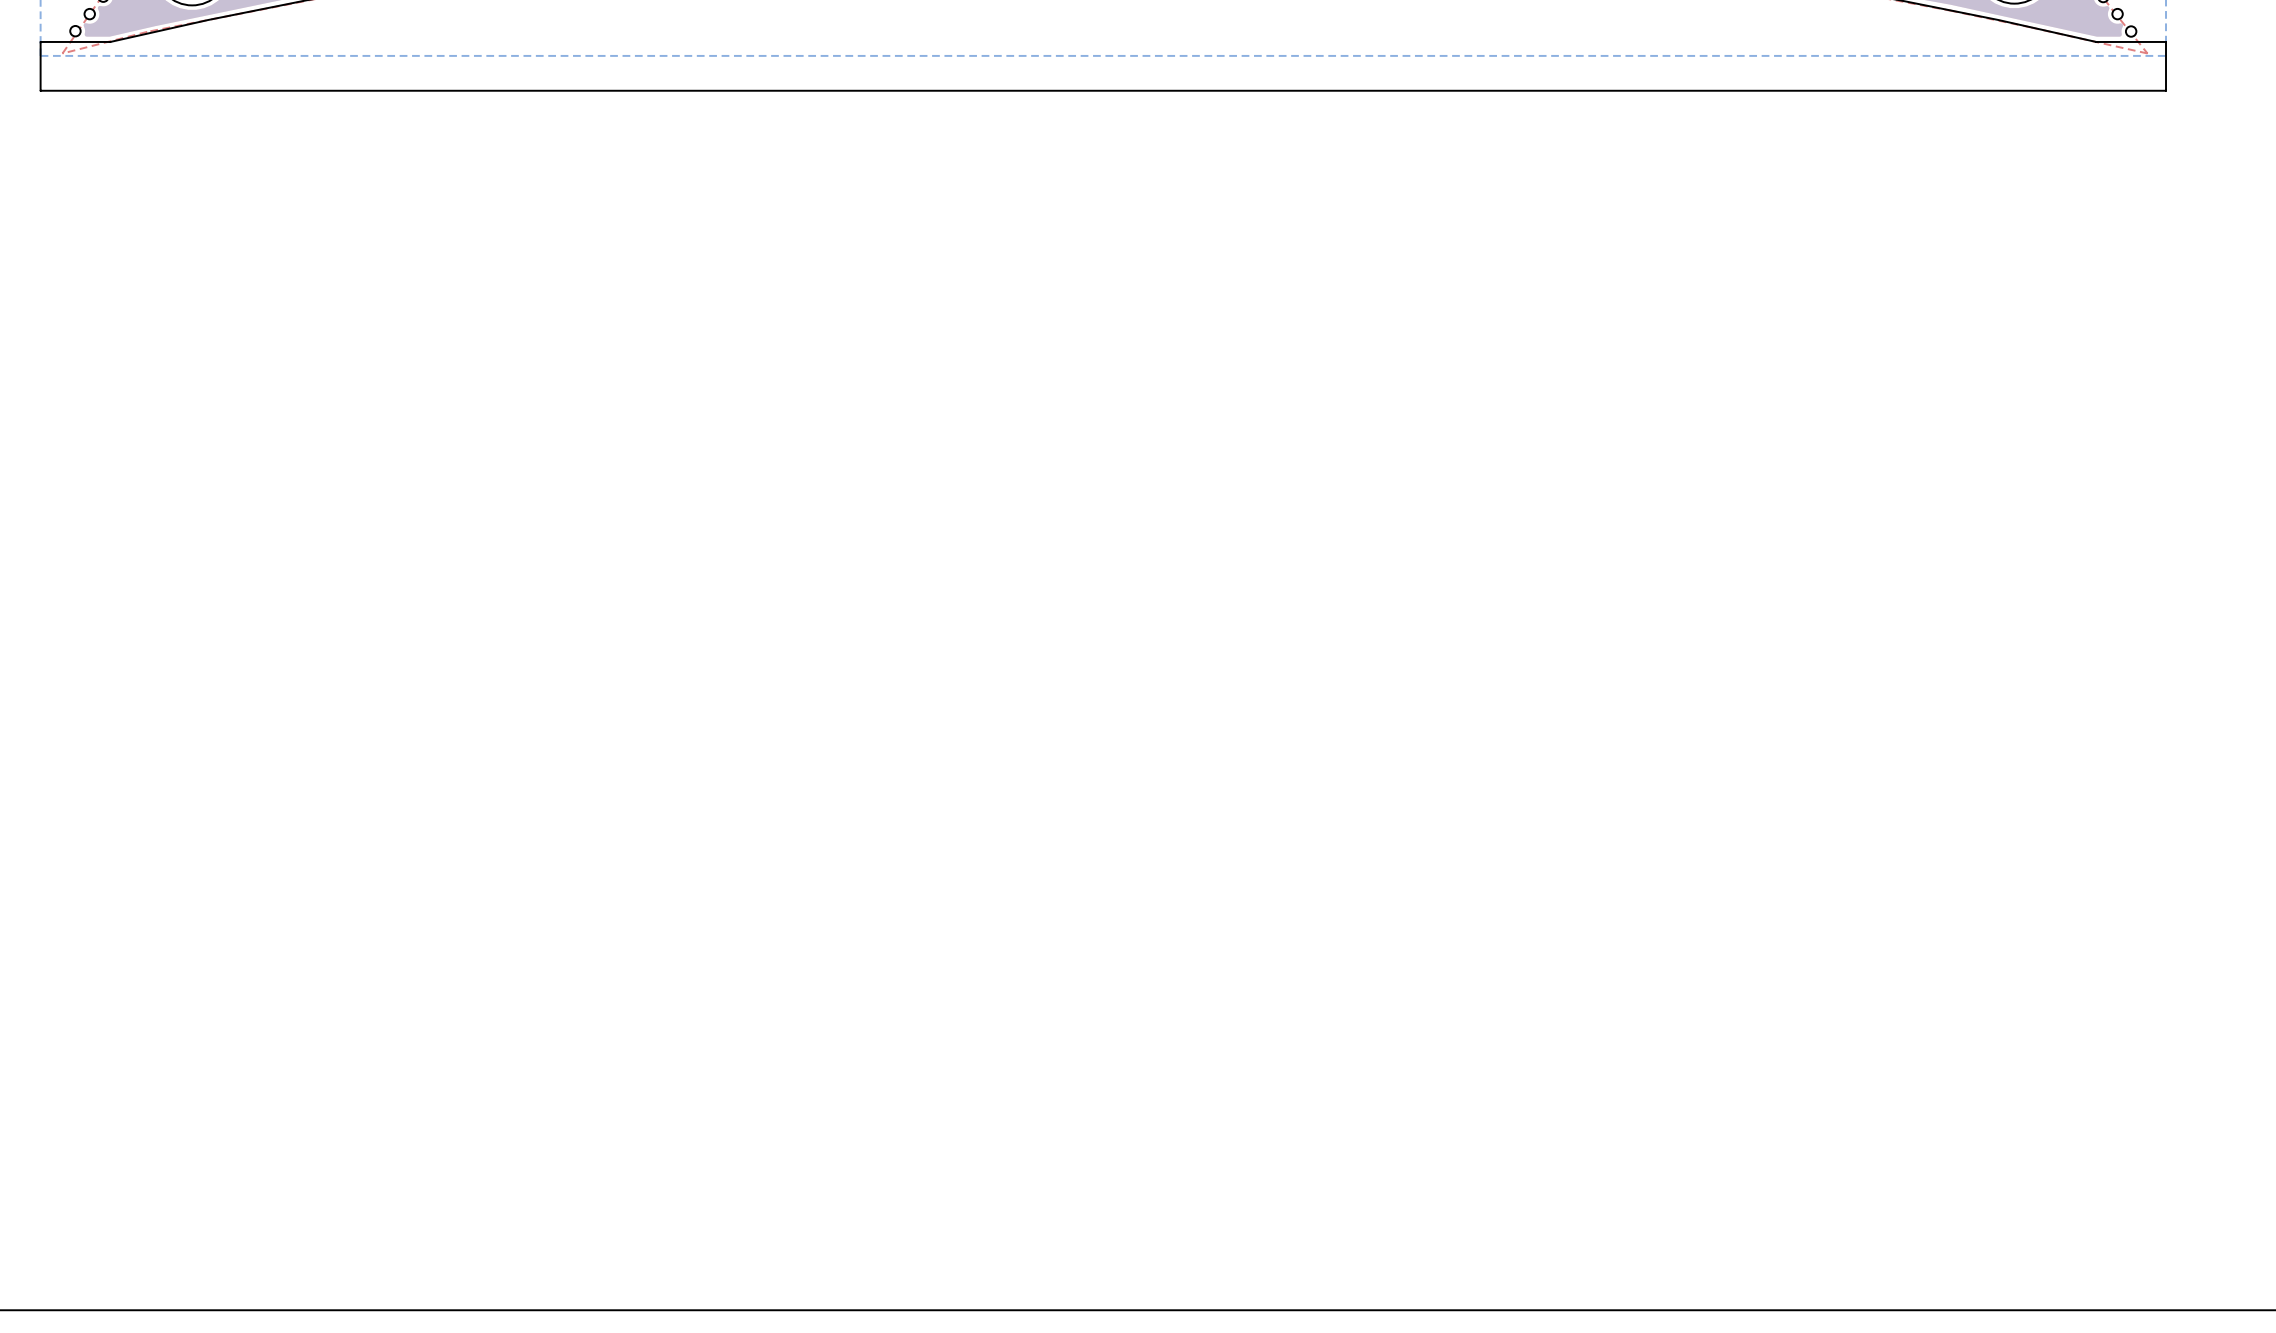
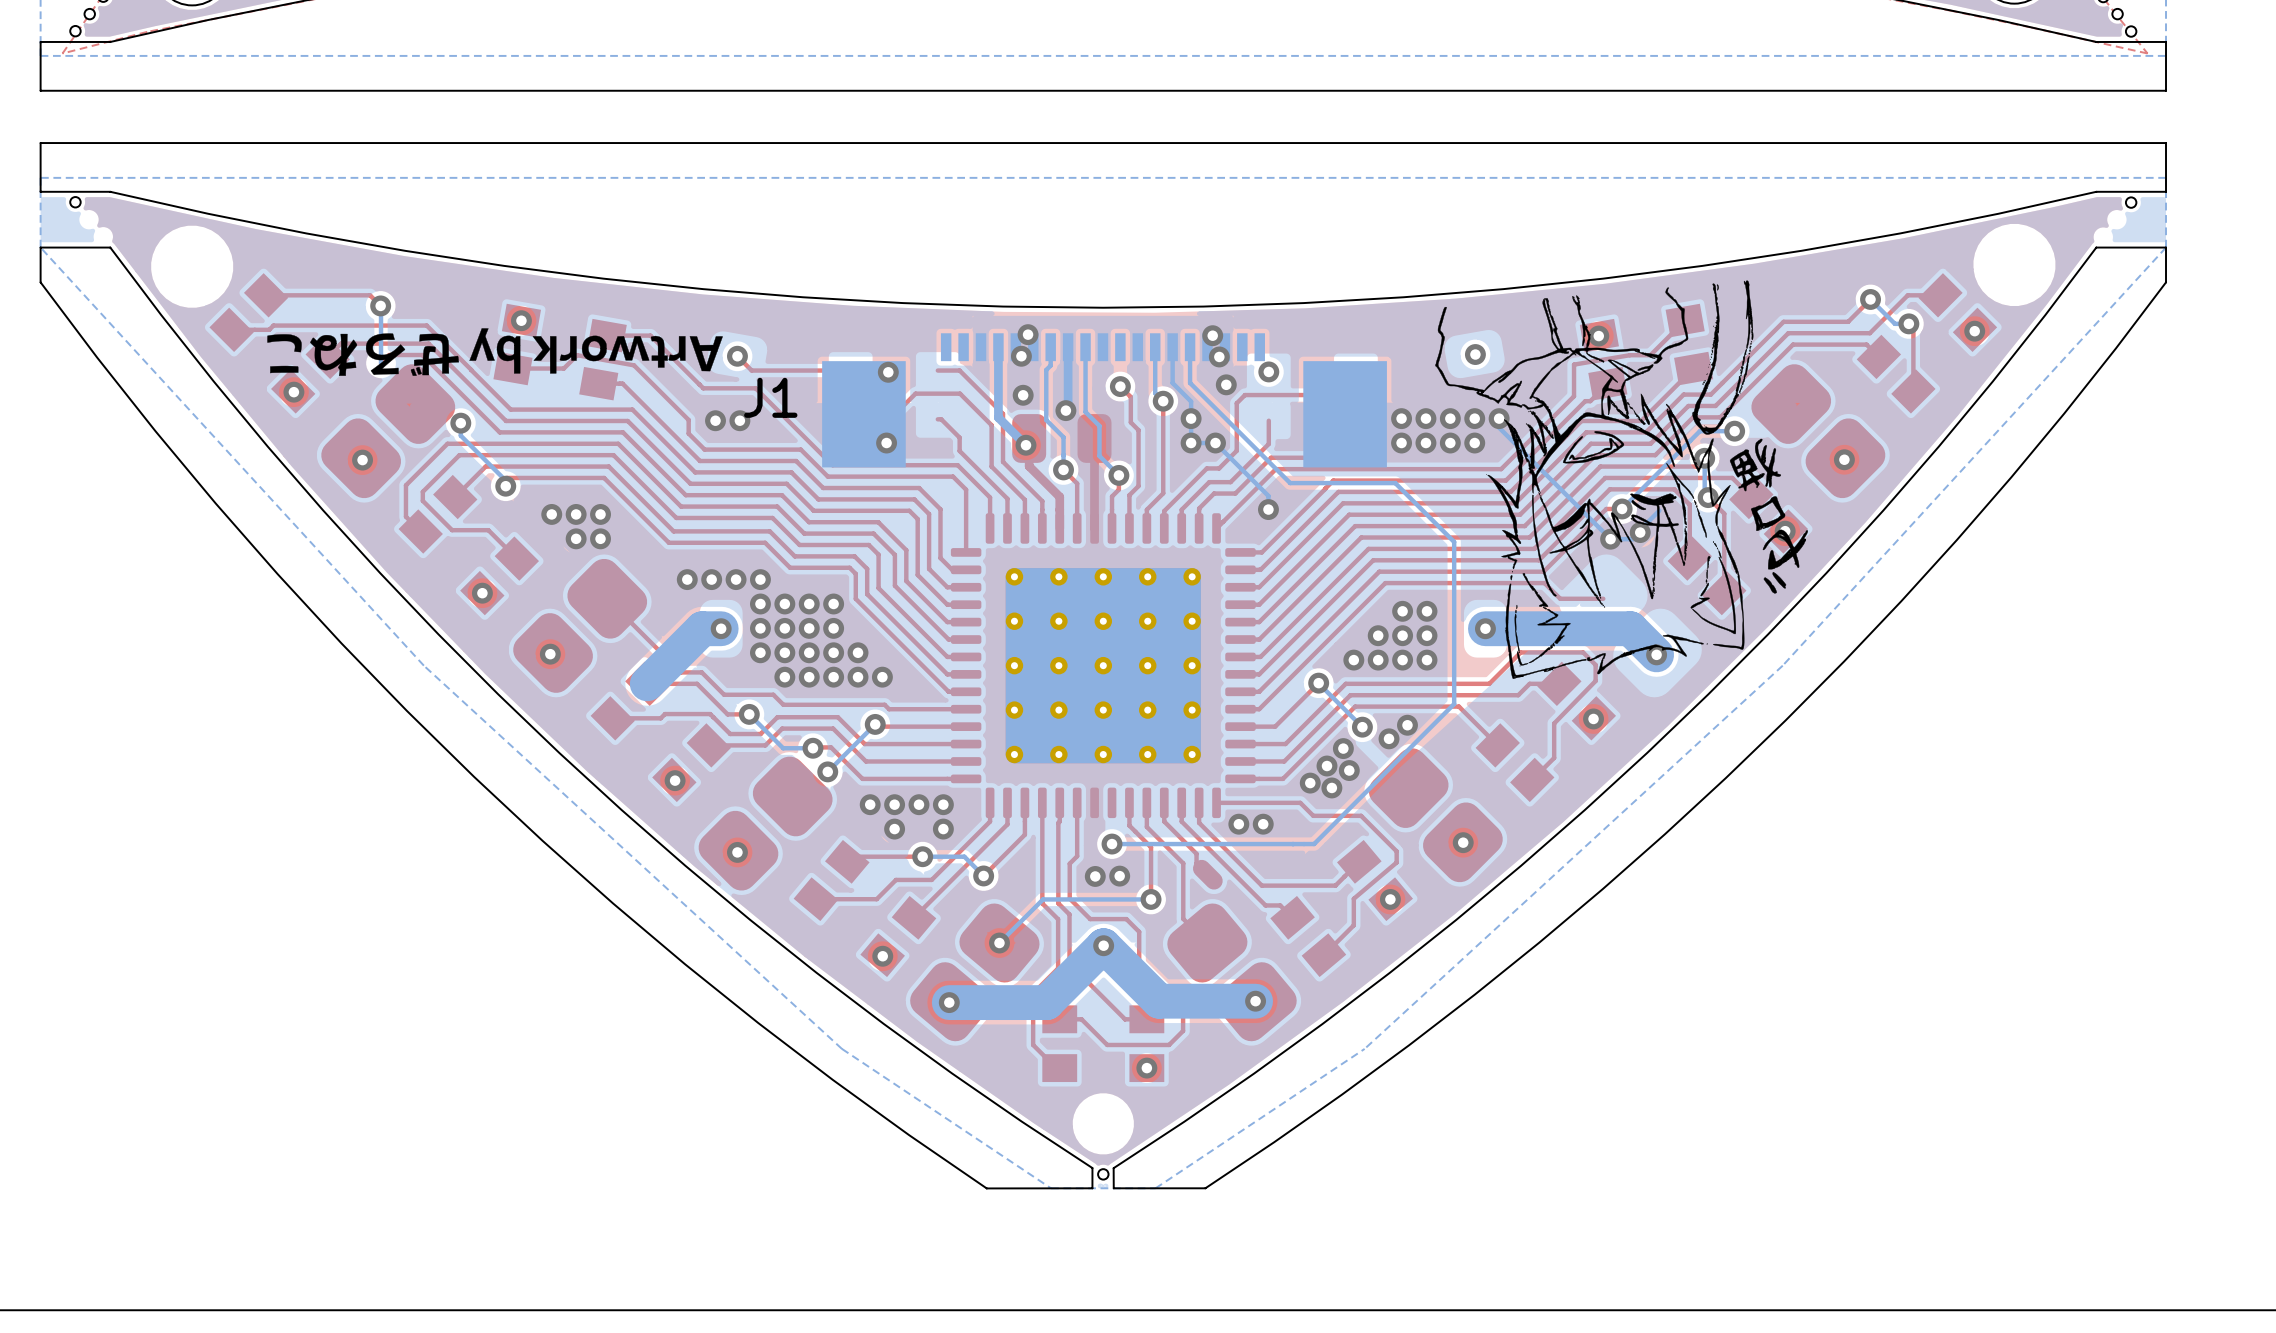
board edge: none -> (2166, 143) (2166, 191) (2096, 191) (1998, 213) (1801, 250) (1603, 278) (1403, 297) (1203, 306) (1103, 307) (902, 303) (703, 289) (603, 278) (404, 250) (208, 213) (110, 191) (40, 191) (40, 143) (2166, 143)
bottom zone outline: none -> (2166, 177) (2166, 247) (1782, 665) (1364, 1048) (1155, 1188) (1051, 1188) (841, 1048) (423, 665) (40, 247) (40, 177) (2166, 177)
part: none -> (75, 202)
part: none -> (2131, 202)
board edge: none -> (110, 247) (40, 247) (40, 282) (155, 431) (277, 574) (341, 643) (474, 776) (542, 841) (684, 964) (833, 1080) (986, 1188) (1092, 1188) (1092, 1168) (952, 1073) (816, 972) (685, 865) (559, 752) (438, 634) (323, 510) (213, 381) (110, 247)
board edge: none -> (2166, 247) (2166, 282) (2064, 413) (2011, 477) (1956, 539) (1844, 661) (1725, 778) (1664, 834) (1602, 889) (1474, 994) (1342, 1094) (1205, 1188) (1113, 1188) (1113, 1168) (1254, 1073) (1389, 972) (1521, 865) (1647, 752) (1768, 634) (1883, 510) (1992, 381) (2096, 247) (2166, 247)
drawing: none -> [1435, 280, 1808, 679]
top track: none -> (266, 295) (370, 295) (380, 305)
top track: none -> (1940, 295) (1907, 295) (1869, 333) (1788, 333) (1715, 405) (1688, 405) (1650, 443) (1591, 443) (1520, 514) (1349, 514) (1259, 604) (1240, 604)
top track: none -> (1870, 299) (1848, 321) (1783, 321) (1710, 394) (1683, 394) (1645, 432) (1586, 432) (1515, 503) (1343, 503) (1259, 587) (1240, 587)
bottom track: none -> (1870, 299) (1894, 323) (1908, 323)
via: none -> (1870, 299)
via: none -> (380, 305)
bottom track: none -> (381, 306) (381, 363)
via: none -> (521, 320)
top track: none -> (1685, 320) (1650, 355) (1629, 355) (1574, 364) (1574, 396) (1501, 469) (1275, 469) (1216, 528)
top track: none -> (1908, 323) (1913, 328) (1913, 391)
via: none -> (1908, 323)
drawing: none -> [267, 328, 723, 376]
top track: none -> (231, 329) (269, 329) (273, 325) (426, 325) (510, 409) (632, 409) (695, 472) (791, 472) (818, 499) (914, 499) (929, 514) (929, 568) (947, 587) (966, 587)
via: none -> (1974, 331)
via: none -> (1028, 334)
top track: none -> (607, 335) (650, 335) (703, 388) (755, 388) (832, 465) (957, 465) (990, 497) (990, 528)
via: none -> (1212, 335)
via: none -> (1598, 336)
part: none -> (279, 343)
part: none -> (1926, 343)
bottom track: none -> (998, 347) (998, 417) (1025, 445)
bottom track: none -> (1050, 347) (1050, 365) (1046, 369) (1046, 420) (1063, 437) (1063, 469)
bottom track: none -> (1068, 347) (1068, 408) (1065, 410)
bottom track: none -> (1085, 347) (1085, 412) (1099, 425) (1099, 456) (1118, 475)
bottom track: none -> (1155, 347) (1155, 393) (1163, 401)
bottom track: none -> (1172, 347) (1172, 383) (1191, 401) (1191, 443) (1215, 443) (1268, 495) (1268, 509)
bottom track: none -> (1190, 347) (1190, 382) (1290, 483) (1395, 483) (1454, 541) (1454, 703) (1314, 844) (1112, 844)
part: none -> (560, 352)
part: none -> (1646, 352)
via: none -> (1475, 354)
top track: none -> (327, 356) (341, 343) (428, 343) (506, 420) (627, 420) (690, 483) (786, 483) (813, 510) (909, 510) (917, 519) (917, 575) (947, 604) (966, 604)
top track: none -> (737, 356) (751, 370) (850, 370)
via: none -> (737, 356)
via: none -> (1021, 356)
via: none -> (1219, 356)
top track: none -> (1878, 356) (1866, 344) (1793, 344) (1720, 417) (1693, 417) (1655, 455) (1595, 455) (1524, 526) (1355, 526) (1259, 622) (1240, 622)
top track: none -> (381, 363) (389, 355) (422, 355) (499, 432) (623, 432) (685, 495) (782, 495) (809, 522) (878, 522) (906, 550) (906, 581) (947, 622) (966, 622)
top track: none -> (512, 368) (563, 368) (577, 355) (633, 365) (688, 420) (688, 433) (704, 449) (800, 449) (827, 476) (953, 476) (966, 489) (966, 552)
top track: none -> (1693, 368) (1641, 420) (1581, 420) (1510, 491) (1338, 491) (1260, 569) (1240, 569)
top track: none -> (937, 370) (959, 370) (1003, 413) (1003, 461) (1042, 501) (1042, 528)
via: none -> (1268, 371)
top track: none -> (1355, 371) (1334, 371) (1310, 395) (1244, 395) (1236, 403) (1236, 450) (1219, 468) (1206, 468) (1164, 511) (1164, 528)
via: none -> (888, 372)
top track: none -> (598, 383) (622, 383) (699, 461) (796, 461) (823, 488) (919, 488) (940, 509) (940, 558) (952, 569) (966, 569)
top track: none -> (1607, 383) (1590, 401) (1585, 401) (1505, 480) (1333, 480) (1261, 552) (1240, 552)
via: none -> (1226, 384)
top track: none -> (1120, 386) (1130, 397) (1130, 422) (1138, 430) (1138, 486) (1129, 495) (1129, 528)
via: none -> (1120, 386)
via: none -> (293, 392)
via: none -> (1023, 395)
J1: none -> (1104, 400)
top track: none -> (1163, 401) (1163, 493) (1146, 509) (1146, 528)
via: none -> (1163, 401)
via: none -> (1065, 410)
via: none -> (1191, 418)
via: none -> (1401, 418)
via: none -> (1425, 418)
via: none -> (1450, 418)
via: none -> (1474, 418)
bottom track: none -> (1499, 418) (1499, 427) (1610, 539) (1633, 539) (1659, 510)
via: none -> (1499, 418)
top track: none -> (850, 419) (889, 419) (915, 393) (960, 393) (991, 425) (991, 466) (1024, 499) (1024, 528)
top track: none -> (937, 419) (941, 419) (959, 437) (959, 451) (1007, 498) (1007, 528)
via: none -> (715, 420)
via: none -> (739, 420)
top track: none -> (1268, 420) (1268, 443) (1230, 482) (1209, 482) (1181, 509) (1181, 528)
top track: none -> (1355, 420) (1352, 420) (1315, 457) (1271, 457) (1235, 493) (1214, 493) (1199, 508) (1199, 528)
bottom track: none -> (460, 423) (460, 435) (505, 479)
via: none -> (460, 423)
part: none -> (388, 431)
bottom track: none -> (1734, 431) (1699, 431) (1622, 508)
via: none -> (1734, 431)
part: none -> (1818, 431)
top track: none -> (1029, 438) (1029, 466) (1059, 496) (1059, 528)
part: none -> (1061, 438)
top track: none -> (1093, 438) (1094, 528)
via: none -> (886, 443)
via: none -> (1191, 443)
via: none -> (1215, 443)
via: none -> (1401, 443)
via: none -> (1425, 443)
via: none -> (1450, 443)
via: none -> (1474, 443)
via: none -> (1025, 445)
top track: none -> (1704, 458) (1696, 466) (1600, 466) (1529, 537) (1361, 537) (1259, 639) (1240, 639)
bottom track: none -> (1704, 458) (1704, 494) (1708, 497)
via: none -> (1704, 458)
via: none -> (1844, 459)
via: none -> (362, 460)
top track: none -> (1063, 469) (1077, 483) (1077, 528)
via: none -> (1063, 469)
top track: none -> (1118, 475) (1118, 489) (1112, 496) (1112, 528)
via: none -> (1118, 475)
top track: none -> (505, 479) (507, 477) (604, 477) (668, 542) (765, 542) (790, 567) (849, 567) (855, 573) (855, 598) (948, 691) (966, 691)
via: none -> (505, 486)
top track: none -> (455, 497) (485, 466) (608, 466) (673, 531) (769, 531) (794, 556) (854, 556) (867, 568) (867, 594) (947, 674) (966, 674)
top track: none -> (1708, 497) (1724, 513) (1724, 593)
via: none -> (1708, 497)
top track: none -> (1751, 497) (1732, 477) (1605, 477) (1534, 548) (1368, 548) (1260, 656) (1240, 656)
top track: none -> (1622, 508) (1606, 508) (1543, 571) (1379, 571) (1259, 691) (1240, 691)
via: none -> (1622, 508)
via: none -> (1268, 509)
via: none -> (551, 514)
via: none -> (576, 514)
via: none -> (600, 514)
top track: none -> (420, 531) (405, 516) (405, 485) (447, 443) (618, 443) (681, 506) (777, 506) (804, 533) (873, 533) (894, 554) (894, 585) (948, 639) (966, 639)
via: none -> (1785, 531)
via: none -> (1640, 532)
via: none -> (576, 538)
via: none -> (600, 538)
via: none -> (1610, 539)
part: none -> (468, 545)
part: none -> (1737, 545)
top track: none -> (516, 558) (488, 530) (452, 530) (422, 500) (422, 491) (459, 455) (613, 455) (676, 517) (772, 517) (799, 544) (868, 544) (878, 554) (878, 588) (947, 656) (966, 656)
top track: none -> (1689, 558) (1689, 504) (1674, 489) (1609, 489) (1538, 560) (1373, 560) (1259, 674) (1240, 674)
via: none -> (687, 579)
via: none -> (711, 579)
via: none -> (736, 579)
via: none -> (760, 579)
via: none -> (482, 593)
top track: none -> (607, 598) (680, 672) (701, 672) (724, 694) (773, 694) (783, 704) (884, 704) (889, 709) (966, 709)
top track: none -> (1603, 598) (1560, 598) (1544, 583) (1385, 583) (1259, 709) (1240, 709)
via: none -> (760, 603)
via: none -> (784, 603)
via: none -> (809, 603)
via: none -> (833, 603)
via: none -> (1402, 611)
via: none -> (1426, 611)
part: none -> (580, 625)
bottom track: none -> (721, 628) (702, 628) (647, 683)
via: none -> (721, 628)
via: none -> (760, 628)
via: none -> (784, 628)
via: none -> (809, 628)
via: none -> (833, 628)
bottom track: none -> (1485, 628) (1630, 628) (1656, 654)
via: none -> (1485, 628)
via: none -> (1378, 635)
via: none -> (1402, 635)
via: none -> (1426, 635)
via: none -> (760, 652)
via: none -> (784, 652)
via: none -> (809, 652)
via: none -> (833, 652)
via: none -> (858, 652)
via: none -> (550, 654)
via: none -> (1656, 654)
via: none -> (1353, 660)
via: none -> (1378, 660)
via: none -> (1402, 660)
via: none -> (1426, 660)
part: none -> (1103, 665)
via: none -> (784, 677)
via: none -> (809, 677)
via: none -> (833, 677)
via: none -> (858, 677)
via: none -> (882, 677)
top track: none -> (647, 683) (697, 683) (727, 714) (749, 714)
top track: none -> (1318, 683) (1275, 726) (1240, 726)
bottom track: none -> (1318, 683) (1362, 727)
via: none -> (1318, 683)
top track: none -> (1559, 683) (1529, 683) (1518, 695) (1350, 695) (1284, 761) (1240, 761)
bottom track: none -> (749, 714) (783, 748) (812, 748)
via: none -> (749, 714)
top track: none -> (612, 718) (660, 718) (665, 714) (710, 714) (730, 734) (760, 734) (777, 717) (837, 717) (864, 744) (966, 744)
via: none -> (1593, 718)
top track: none -> (875, 724) (877, 726) (966, 726)
bottom track: none -> (875, 724) (827, 771)
via: none -> (875, 724)
via: none -> (1407, 725)
via: none -> (1362, 727)
part: none -> (660, 731)
part: none -> (1545, 731)
via: none -> (1389, 738)
top track: none -> (1240, 744) (1285, 744) (1345, 683) (1489, 683) (1520, 652) (1583, 652) (1595, 664) (1595, 680) (1554, 723) (1554, 757) (1532, 779)
top track: none -> (708, 745) (765, 745) (782, 728) (833, 728) (866, 761) (966, 761)
top track: none -> (1497, 745) (1458, 706) (1355, 706) (1282, 778) (1240, 778)
top track: none -> (812, 748) (831, 747) (862, 778) (966, 778)
via: none -> (812, 748)
via: none -> (1343, 748)
via: none -> (1327, 766)
via: none -> (1349, 770)
via: none -> (827, 771)
via: none -> (675, 780)
via: none -> (1310, 783)
via: none -> (1331, 787)
top track: none -> (990, 802) (990, 821) (931, 879) (895, 879) (876, 899) (815, 899)
top track: none -> (1007, 802) (1007, 824) (914, 917)
top track: none -> (1024, 802) (1024, 834) (983, 875)
top track: none -> (1042, 802) (1042, 903) (1058, 919) (1058, 968) (1033, 993) (1033, 1044) (1056, 1068) (1059, 1068)
top track: none -> (1059, 802) (1058, 903) (1069, 914) (1069, 963) (1125, 1019) (1146, 1019)
top track: none -> (1077, 802) (1077, 856) (1069, 863) (1069, 898) (1090, 919) (1126, 919) (1139, 931) (1139, 963) (1183, 1007) (1183, 1030) (1169, 1044) (1107, 1044) (1081, 1019) (1054, 1019)
top track: none -> (1129, 802) (1129, 825) (1151, 847) (1151, 899)
top track: none -> (1146, 802) (1146, 826) (1183, 863) (1183, 918) (1207, 943)
top track: none -> (1164, 802) (1164, 821) (1196, 853) (1196, 863) (1207, 874)
top track: none -> (1181, 802) (1181, 821) (1265, 905) (1280, 905) (1292, 917)
top track: none -> (1199, 802) (1199, 822) (1261, 885) (1335, 885) (1359, 861)
top track: none -> (1216, 802) (1300, 802) (1313, 815) (1361, 815) (1396, 851) (1396, 862) (1353, 898) (1353, 925) (1323, 955)
via: none -> (870, 804)
via: none -> (894, 804)
via: none -> (918, 804)
via: none -> (943, 804)
part: none -> (1435, 815)
part: none -> (765, 823)
via: none -> (1238, 824)
via: none -> (1263, 824)
via: none -> (894, 829)
via: none -> (943, 829)
via: none -> (1463, 842)
via: none -> (1112, 844)
via: none -> (737, 852)
top track: none -> (922, 856) (852, 856) (847, 861)
bottom track: none -> (922, 856) (964, 856) (983, 875)
via: none -> (922, 856)
part: none -> (1207, 874)
via: none -> (983, 875)
via: none -> (1095, 876)
via: none -> (1119, 876)
bottom track: none -> (1151, 899) (1043, 899) (999, 943)
via: none -> (1151, 899)
via: none -> (1390, 899)
part: none -> (864, 908)
part: none -> (1341, 908)
via: none -> (999, 943)
via: none -> (1103, 945)
via: none -> (882, 956)
part: none -> (974, 972)
part: none -> (1232, 972)
bottom track: none -> (1255, 1001) (1159, 1001) (1103, 945) (1046, 1002) (949, 1002)
via: none -> (1255, 1001)
via: none -> (949, 1002)
part: none -> (1103, 1043)
via: none -> (1146, 1068)
part: none -> (1103, 1174)

